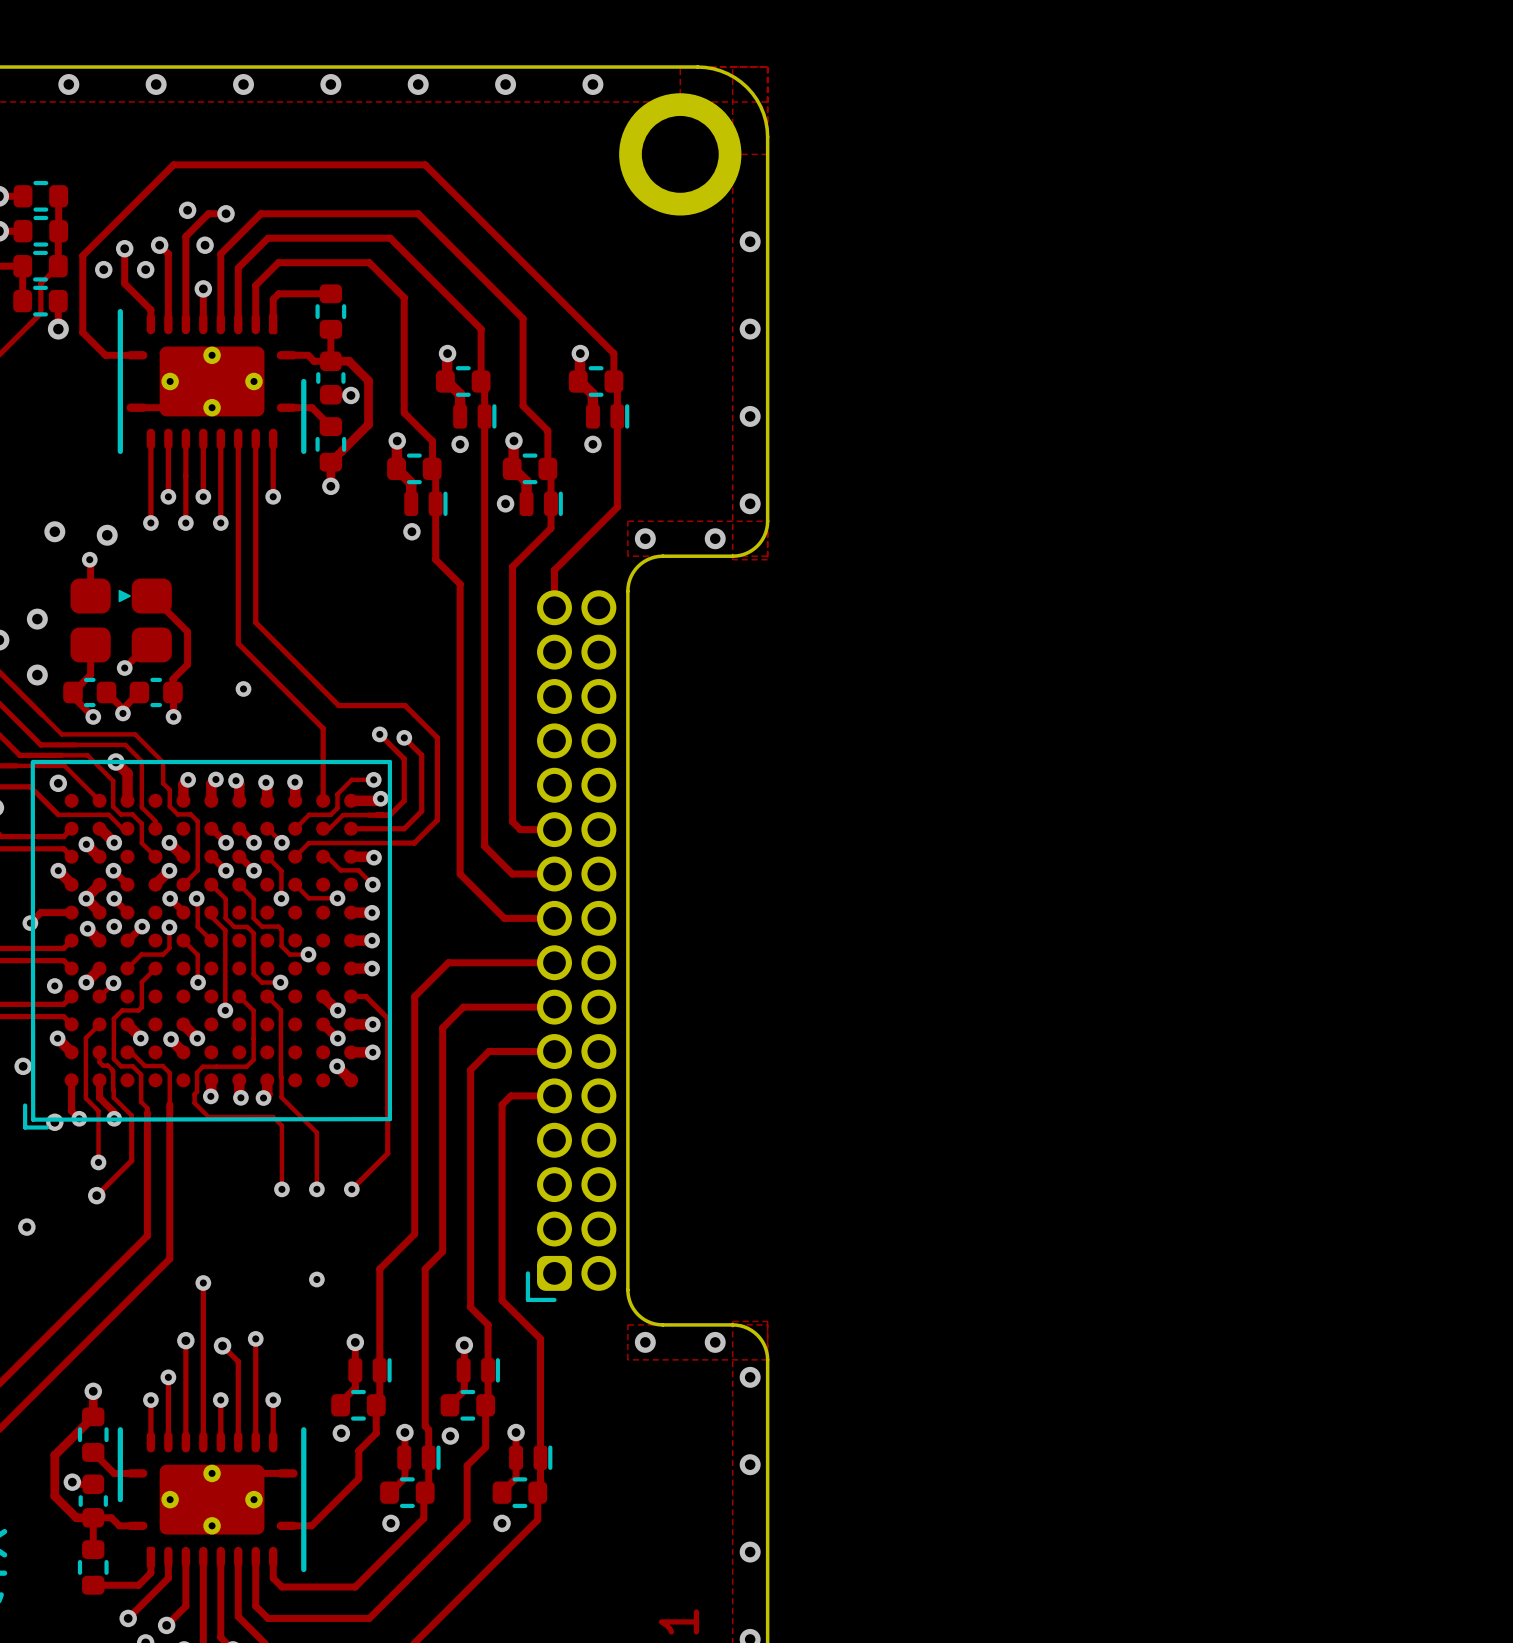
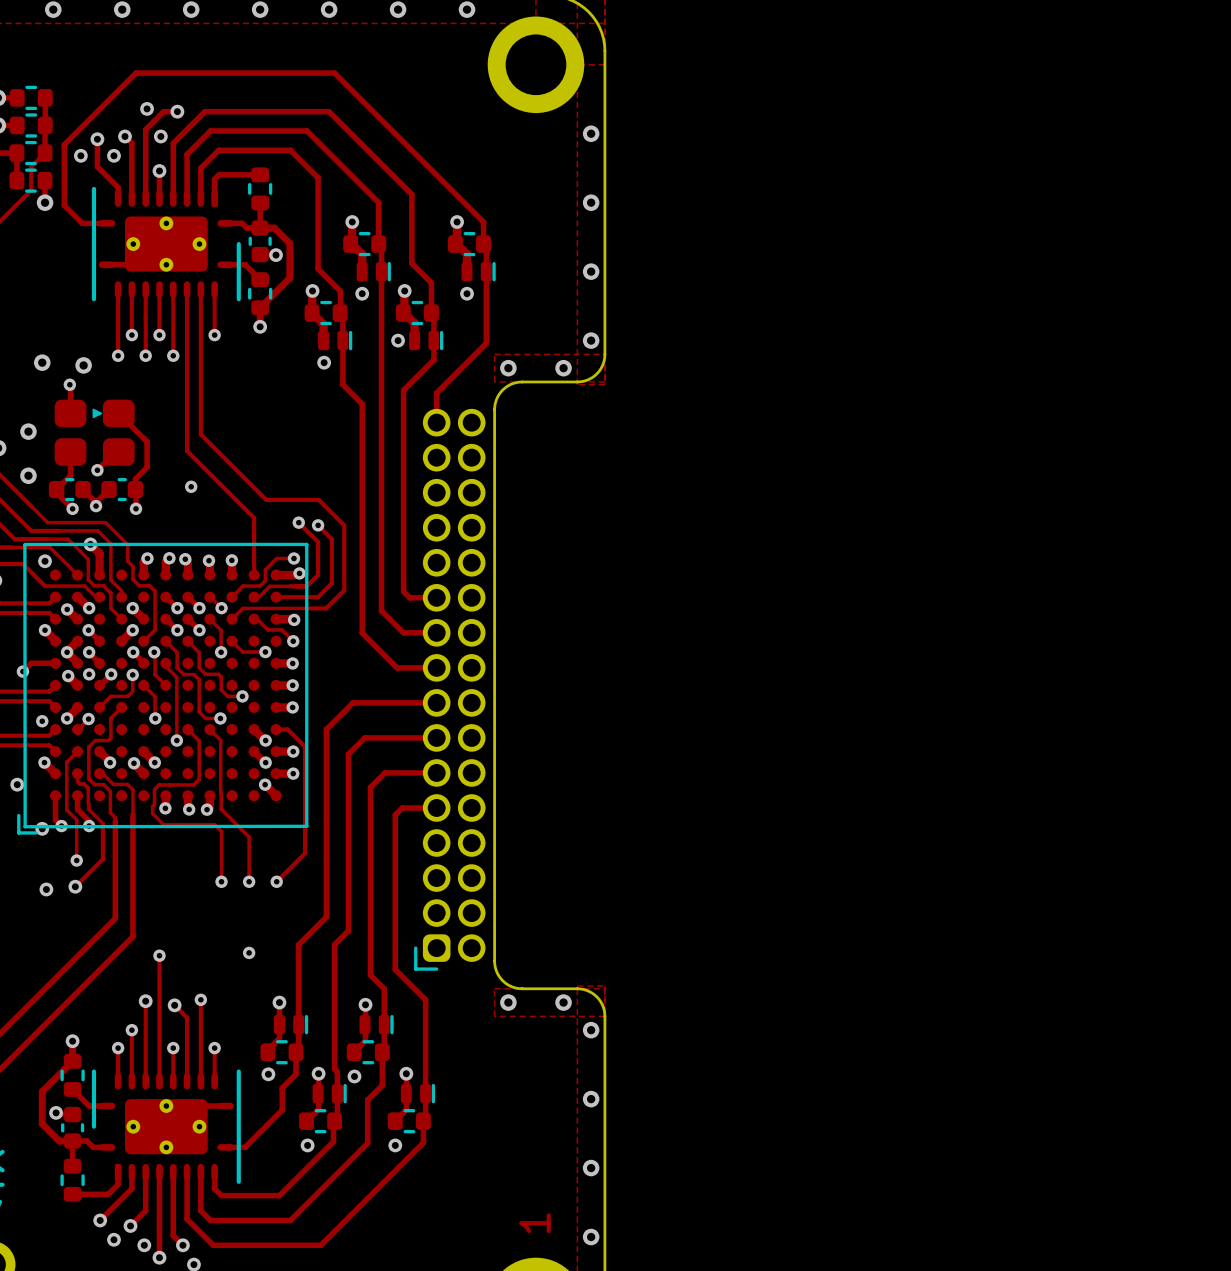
via: none -> (46, 889)
via: (26, 1227) -> none

